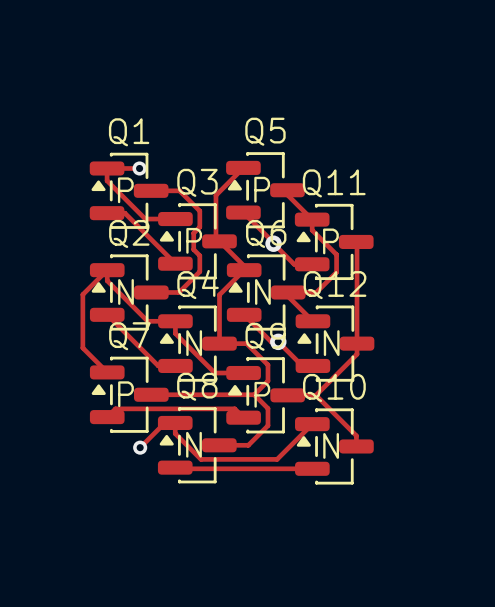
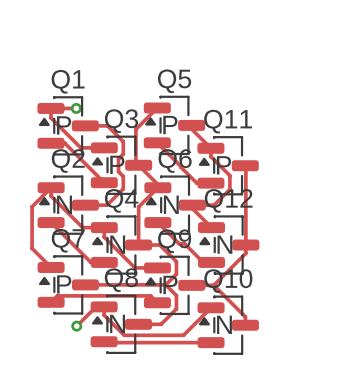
via: (273, 243) -> none
via: (278, 341) -> none

